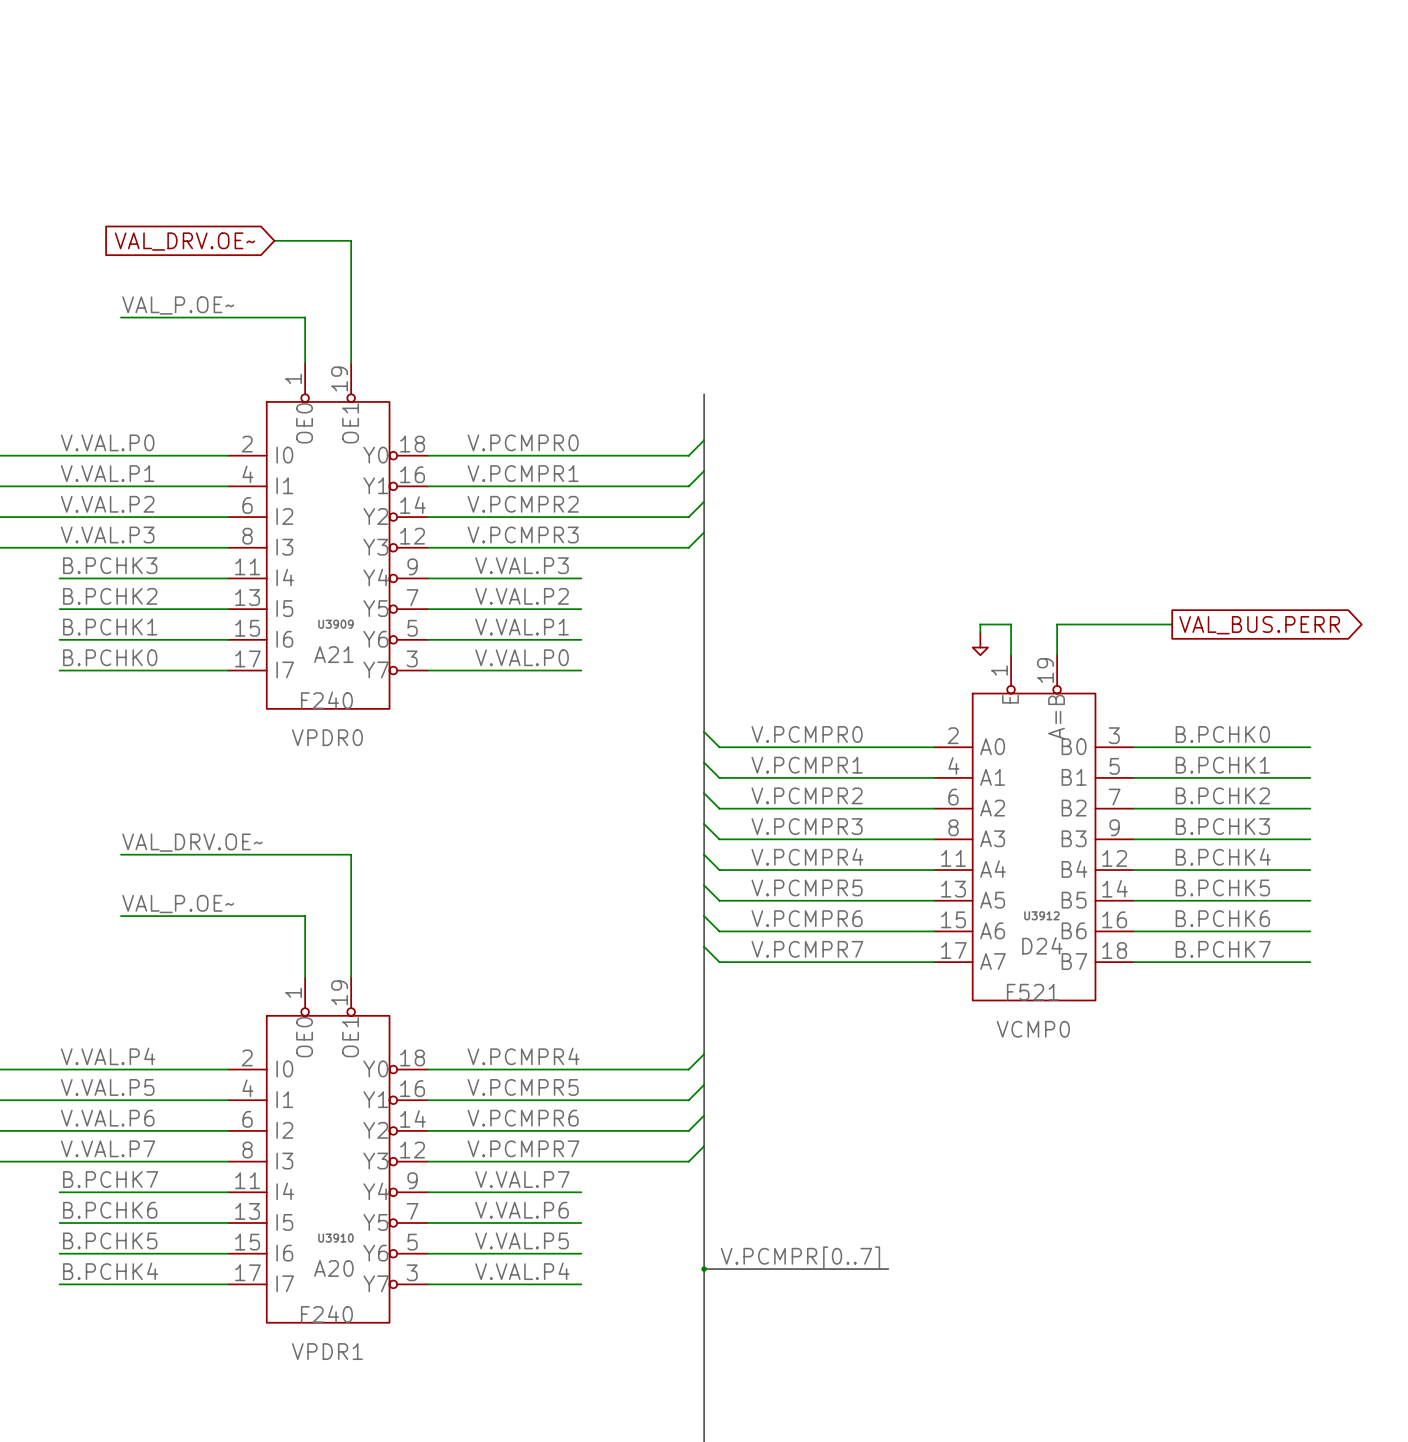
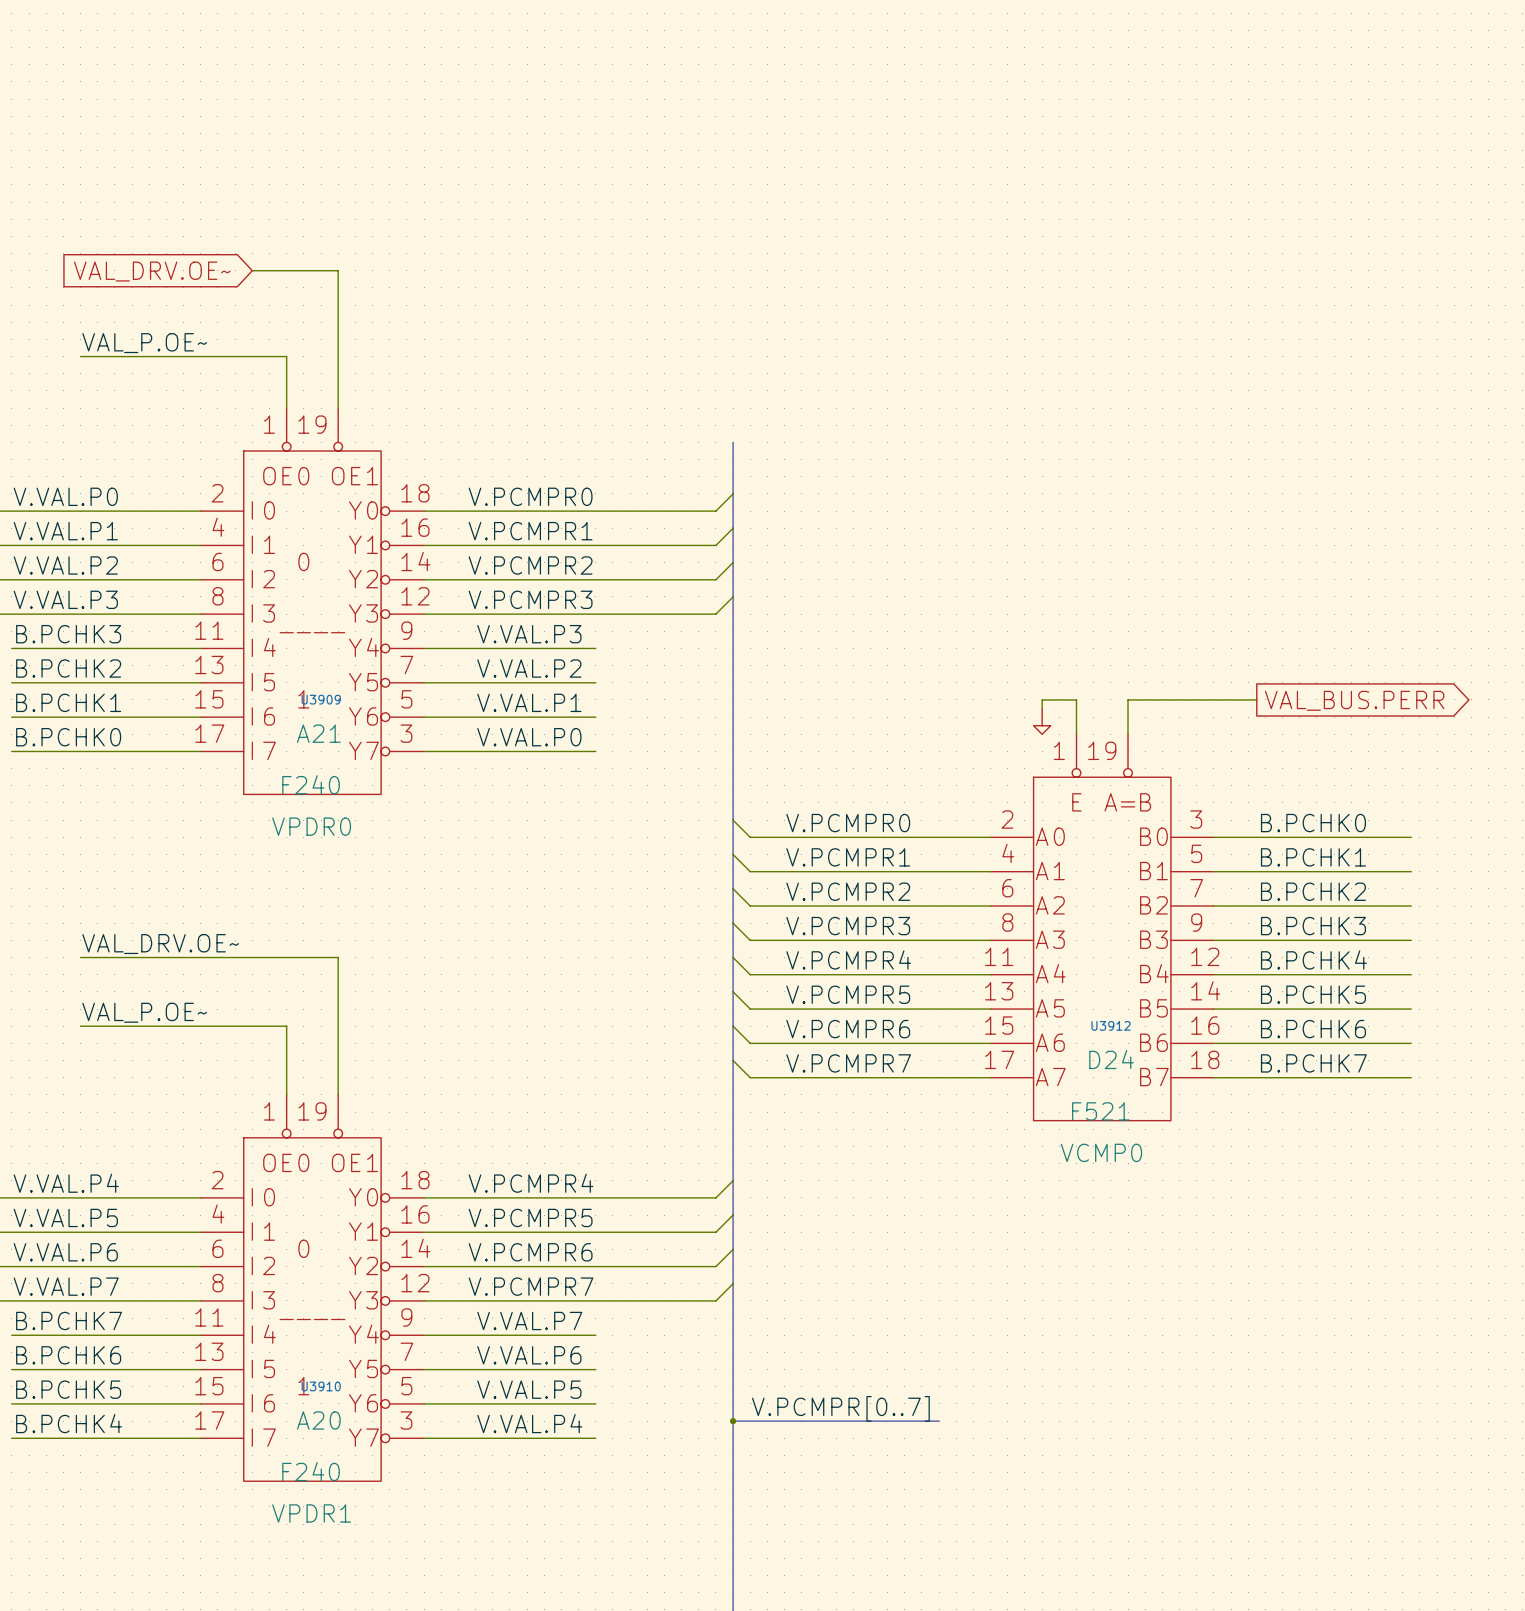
U3909 symbol: [228, 363, 428, 709] -> [200, 408, 425, 795]
U3912 symbol: [934, 655, 1134, 1001] -> [990, 734, 1214, 1121]
U3910 symbol: [228, 977, 428, 1323] -> [200, 1094, 425, 1482]

